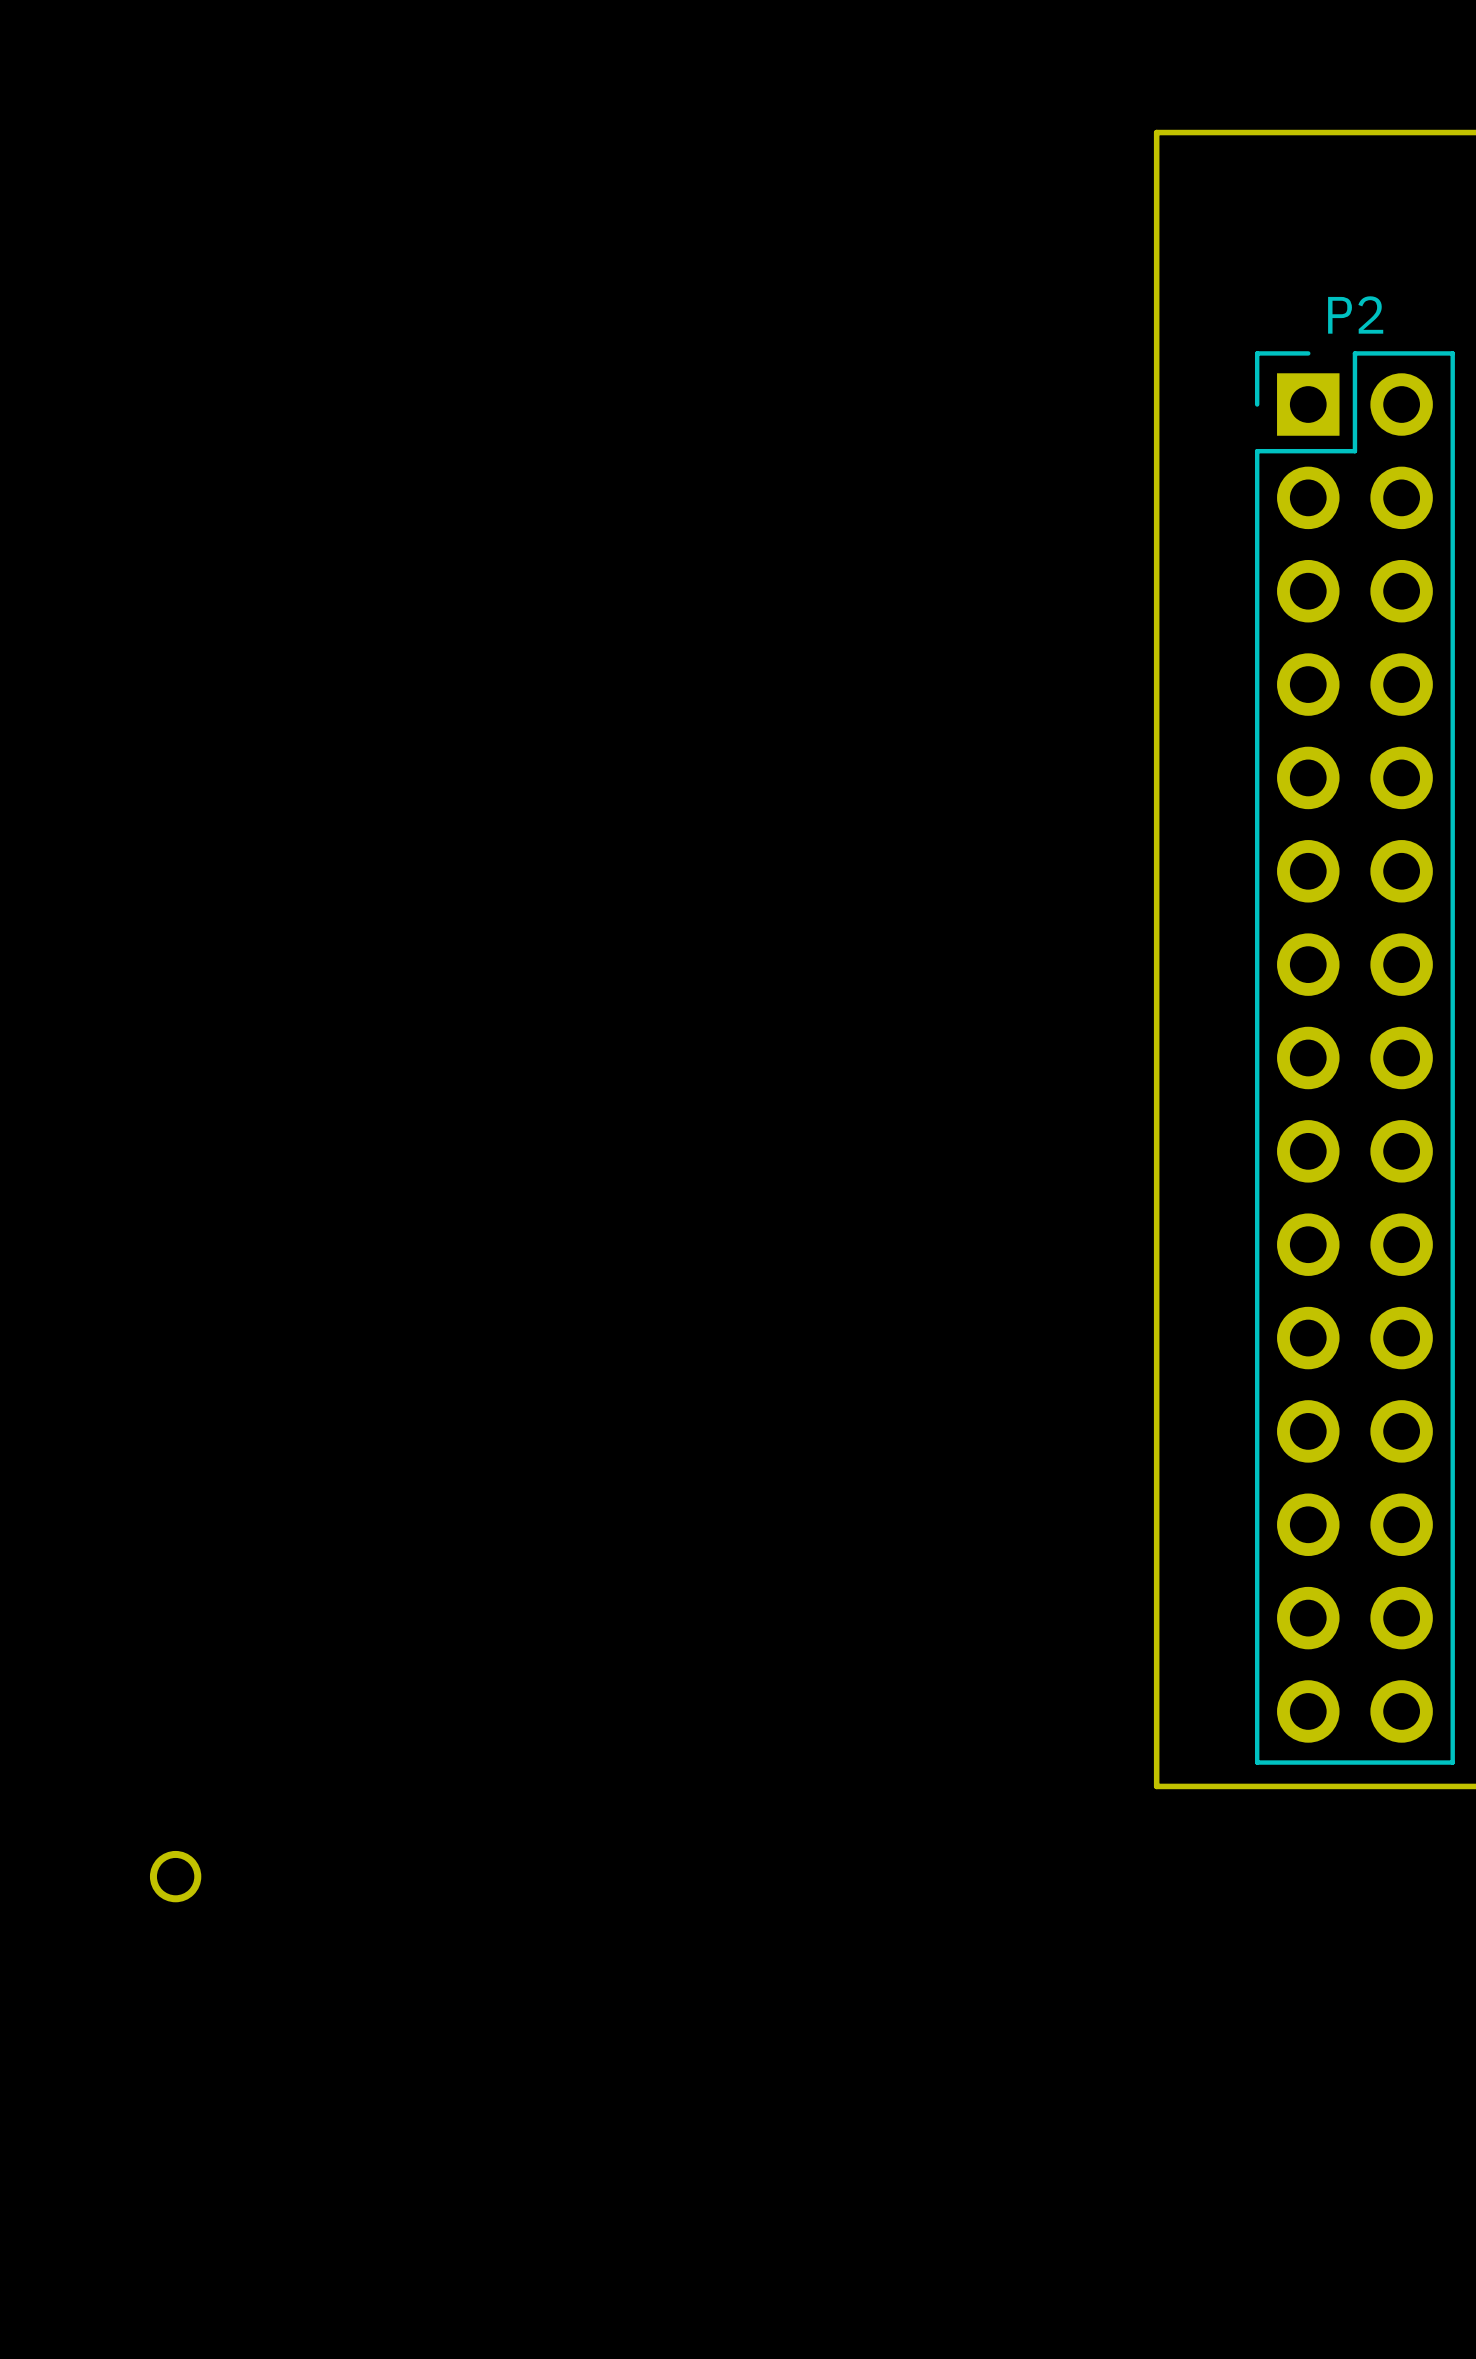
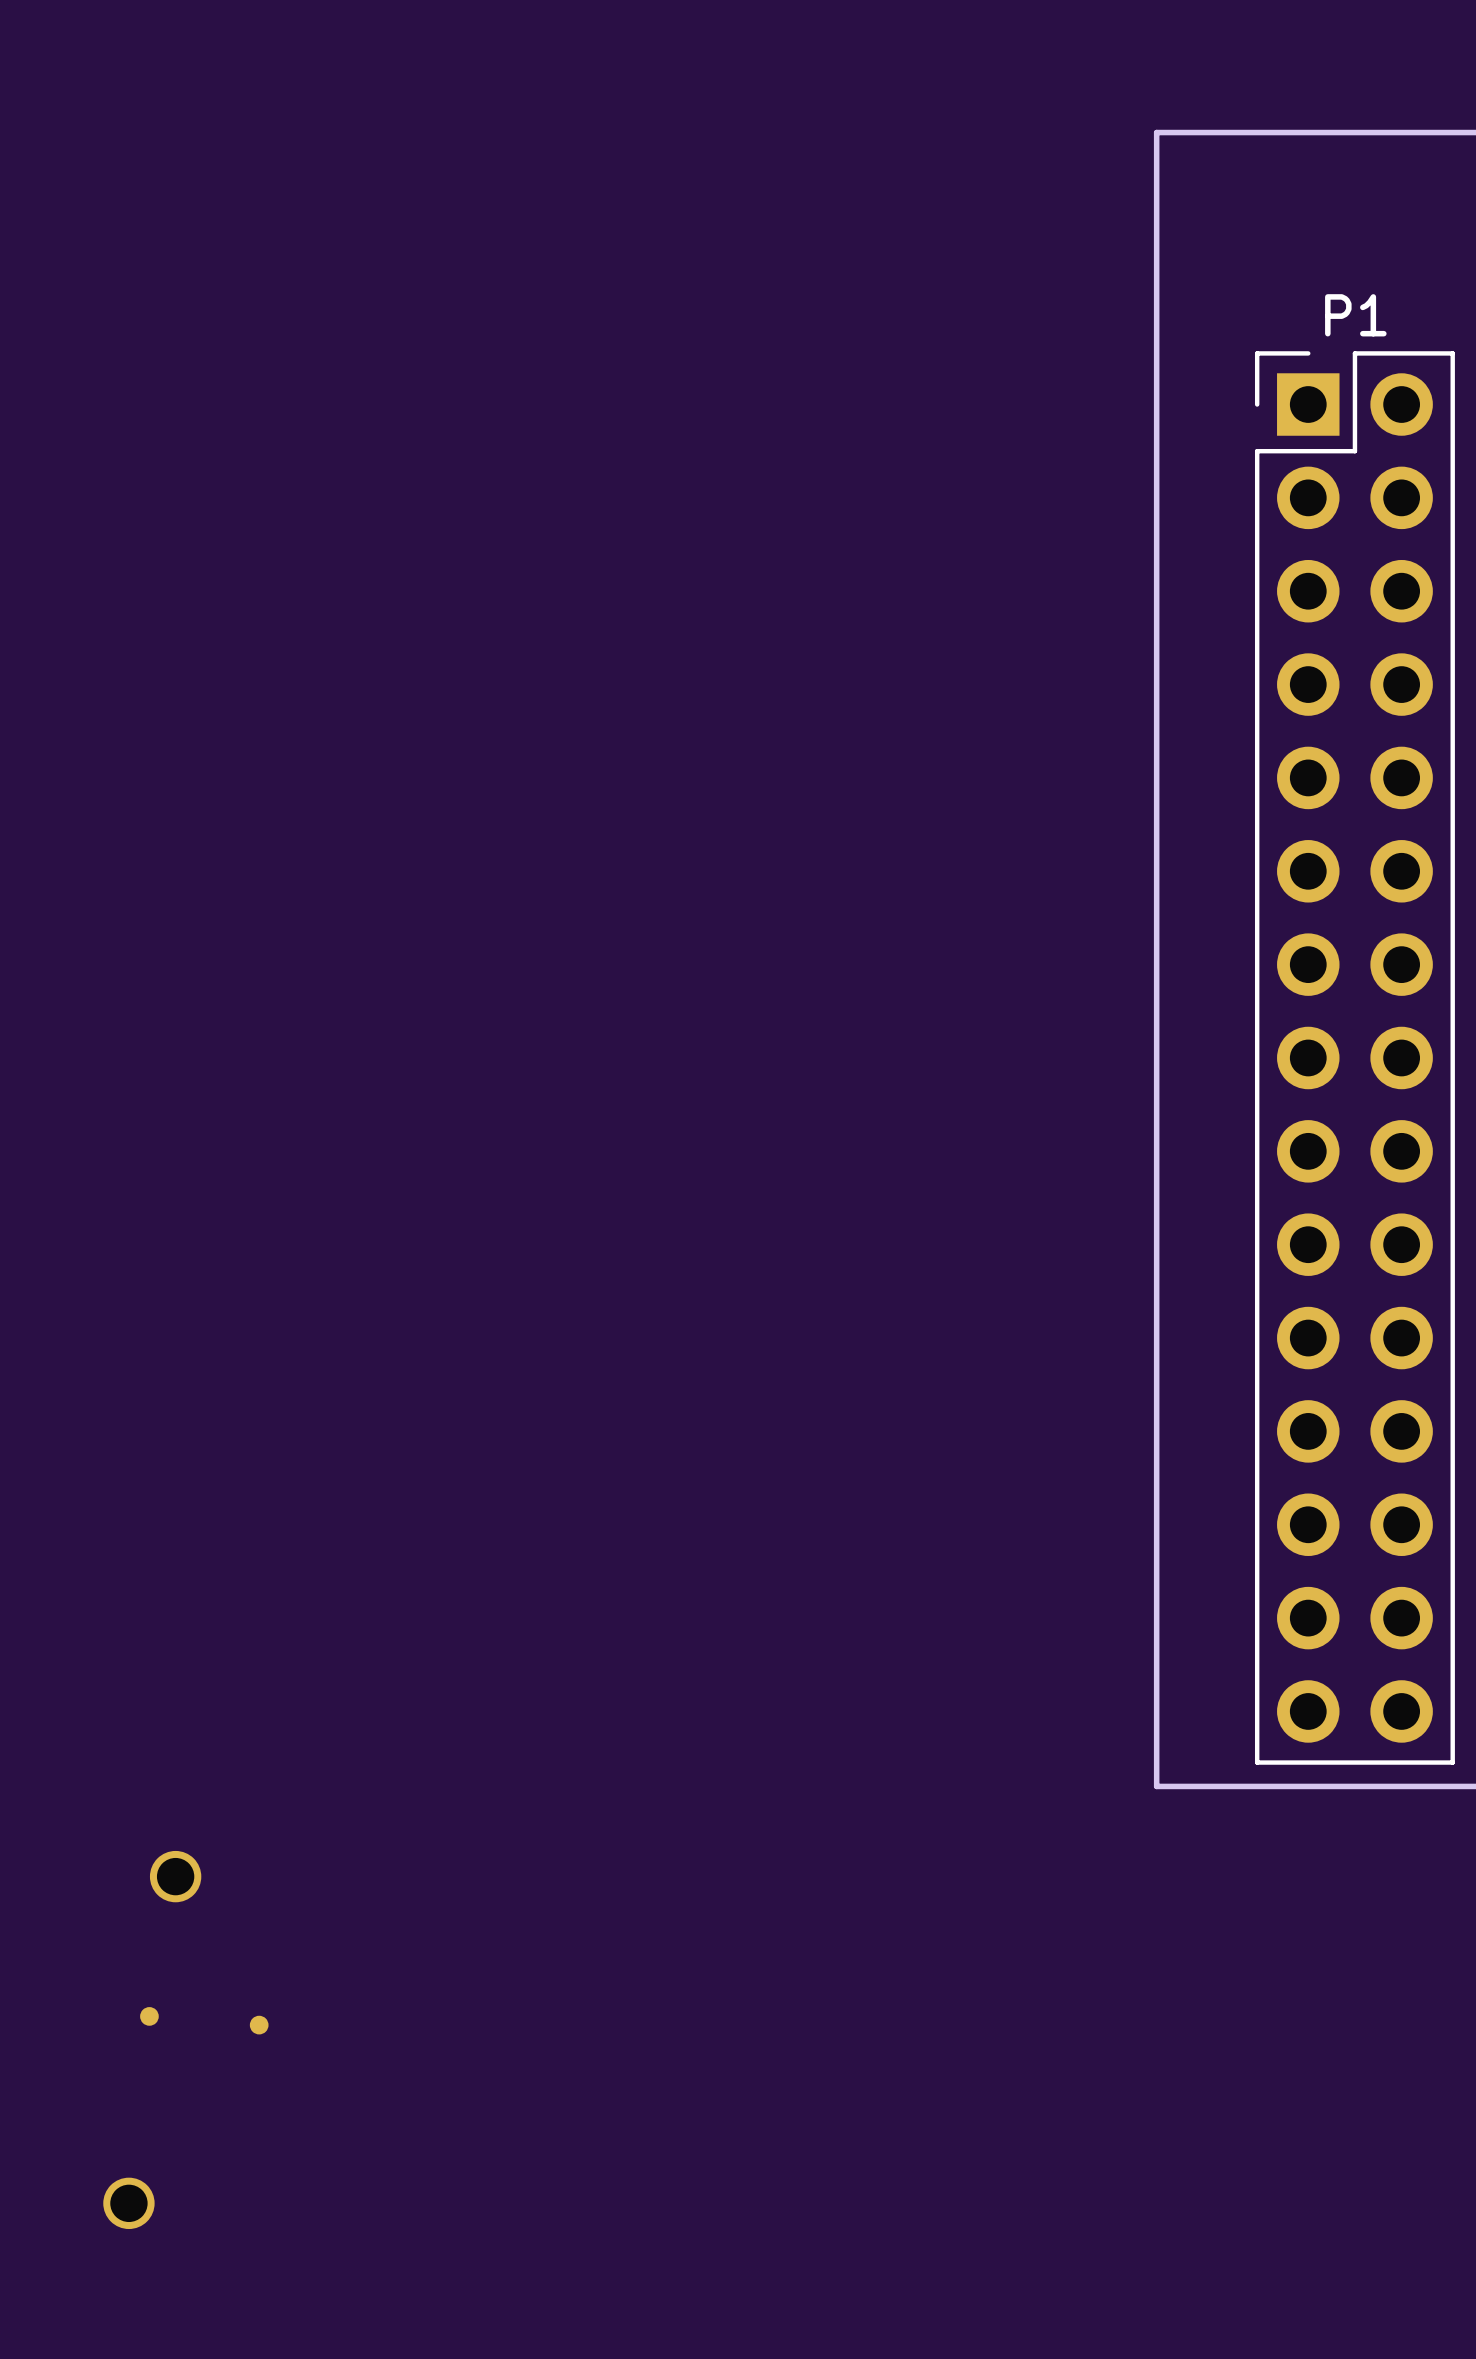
P2 name: P2 (1355, 314) -> P1 (1355, 315)
part: none -> (149, 2016)
part: none -> (259, 2025)
part: none -> (128, 2203)

